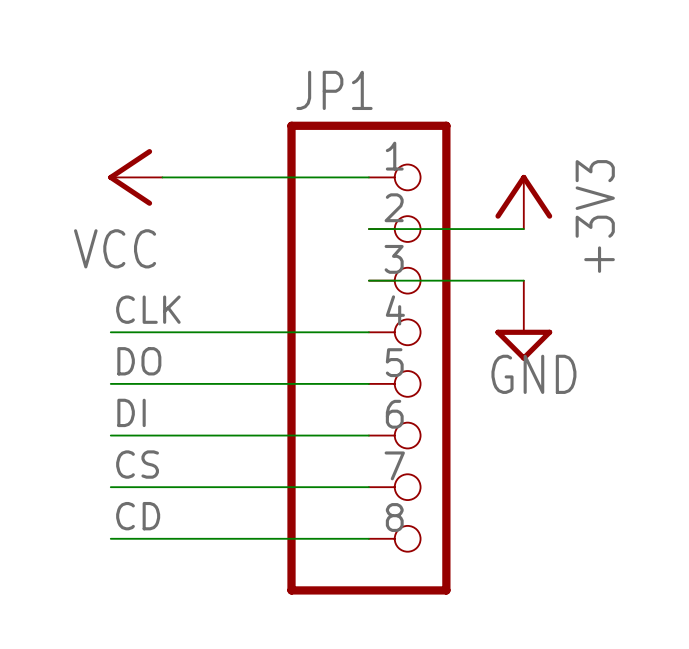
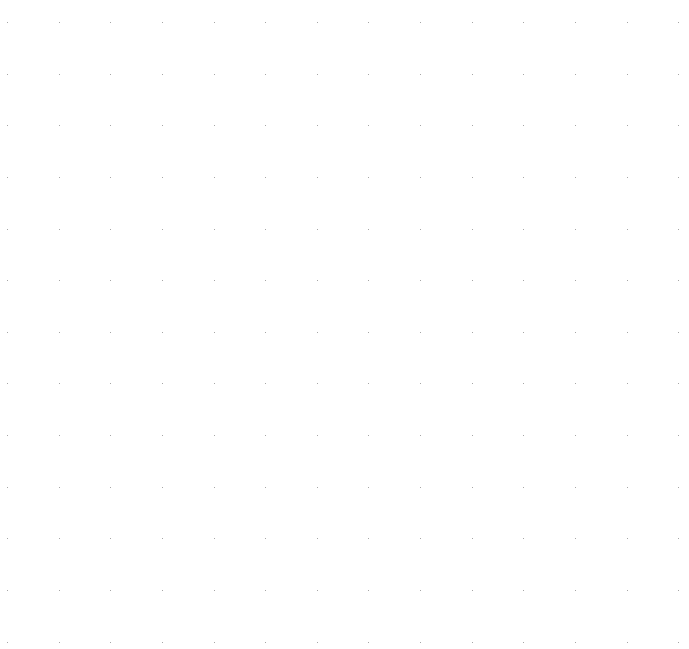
power symbol: VCC (135, 177) -> none
wire: (162, 177) (368, 177) -> none
power symbol: +3V3 (523, 201) -> none
wire: (368, 229) (523, 229) -> none
wire: (368, 280) (523, 280) -> none
label: CLK (148, 309) -> none
power symbol: GND (523, 320) -> none
wire: (110, 332) (368, 332) -> none
JP1: (368, 358) -> none
label: DO (139, 361) -> none
wire: (110, 383) (368, 383) -> none
label: DI (131, 412) -> none
wire: (110, 435) (368, 435) -> none
label: CS (137, 464) -> none
wire: (110, 487) (368, 487) -> none
label: CD (138, 516) -> none
wire: (110, 538) (368, 538) -> none

